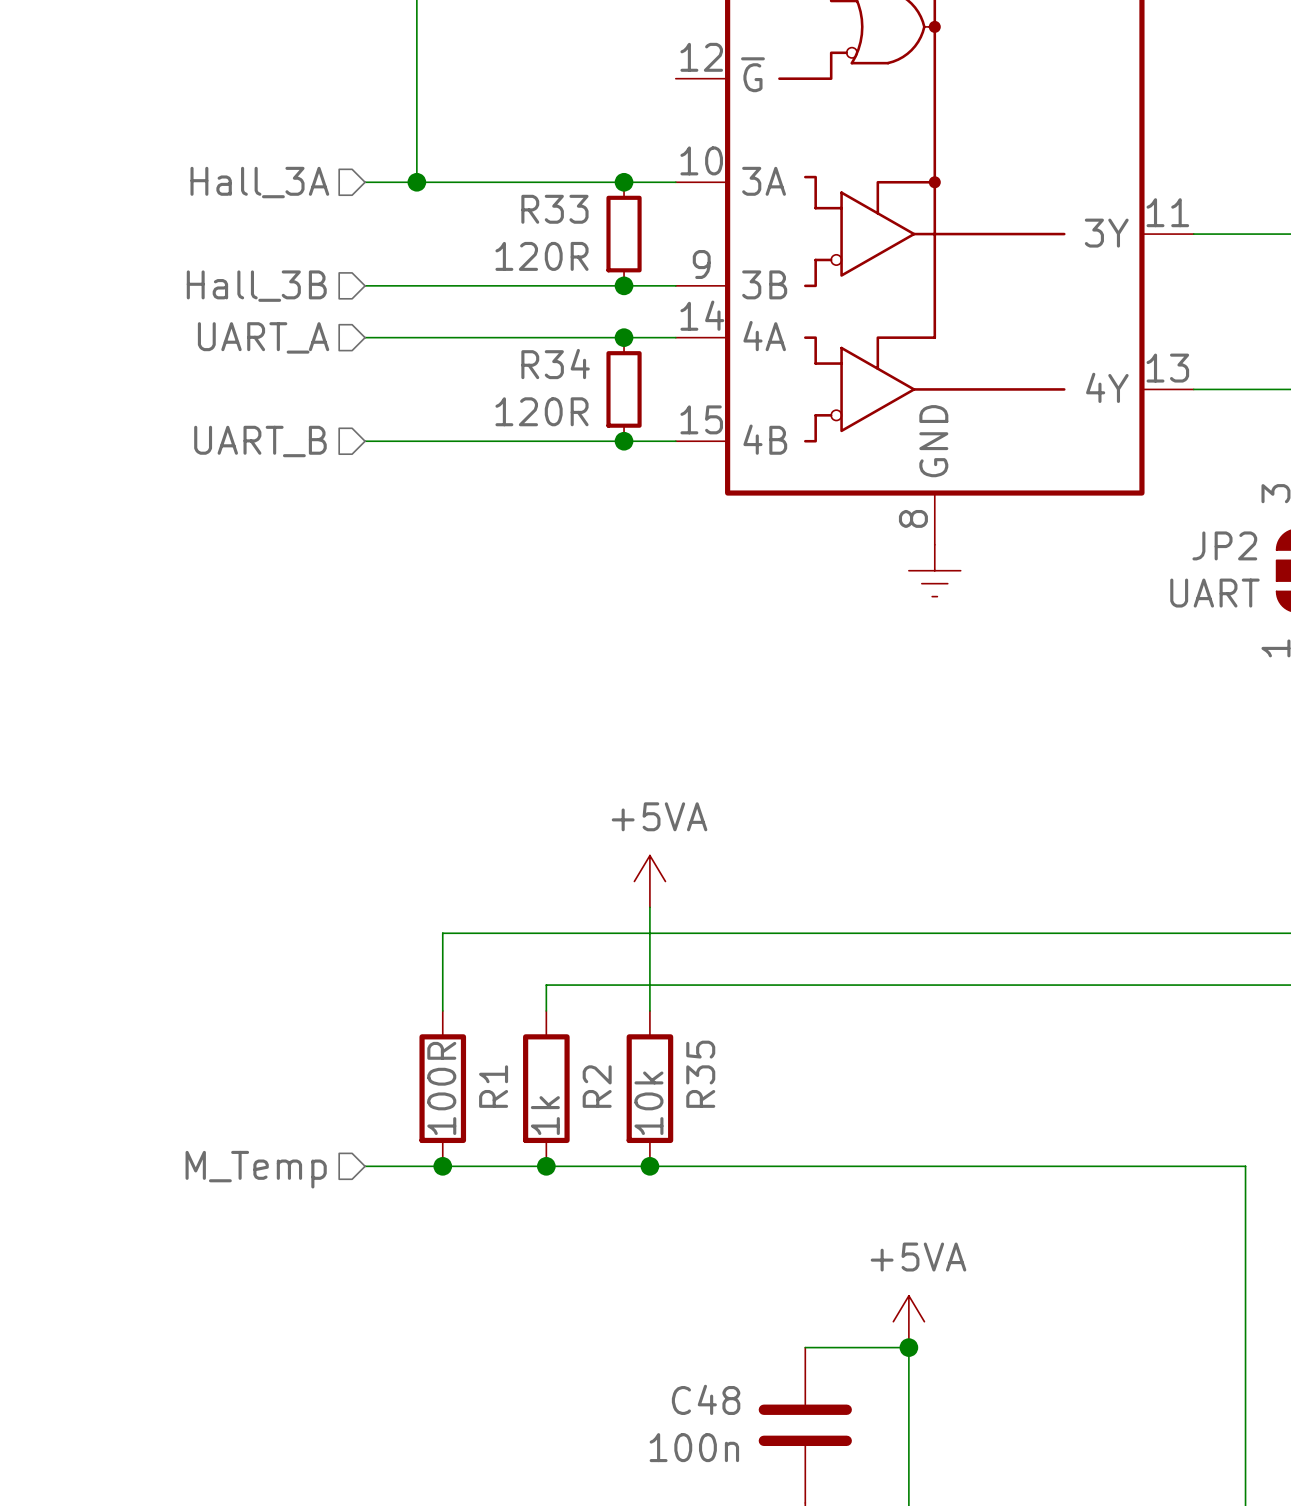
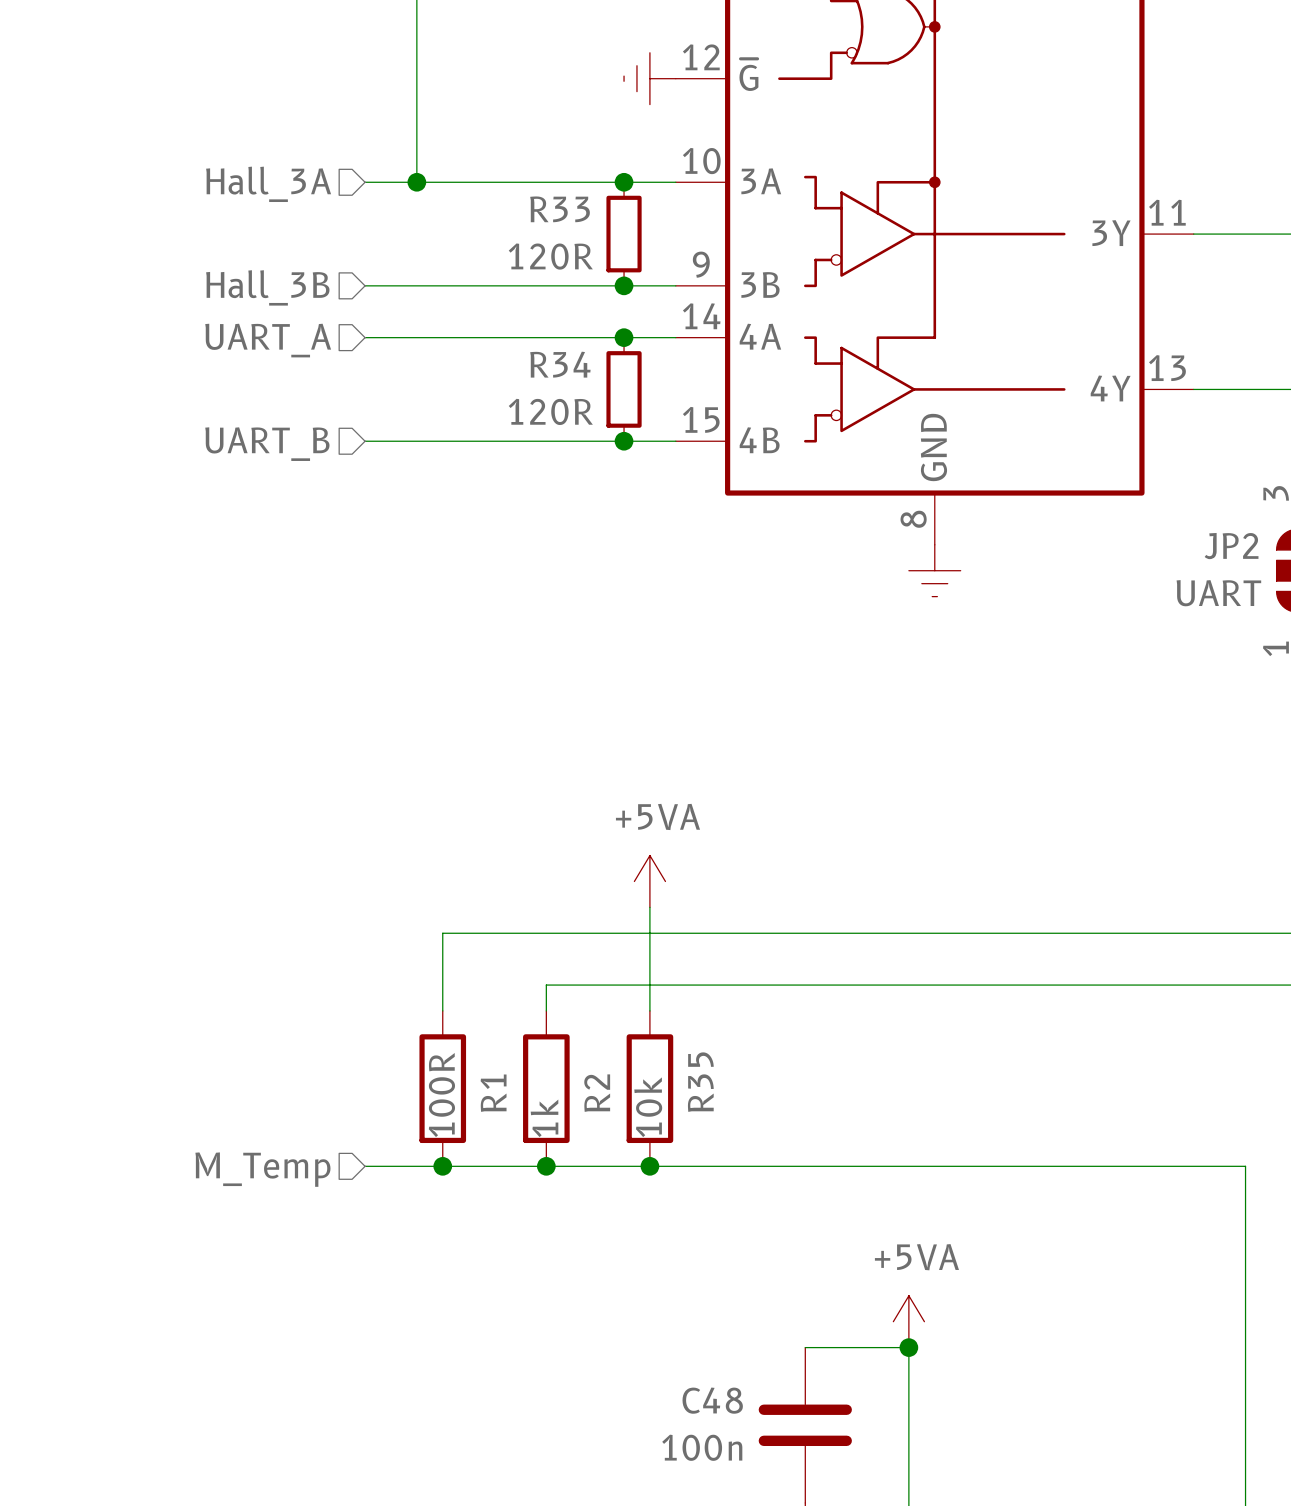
power symbol: none -> (649, 78)

